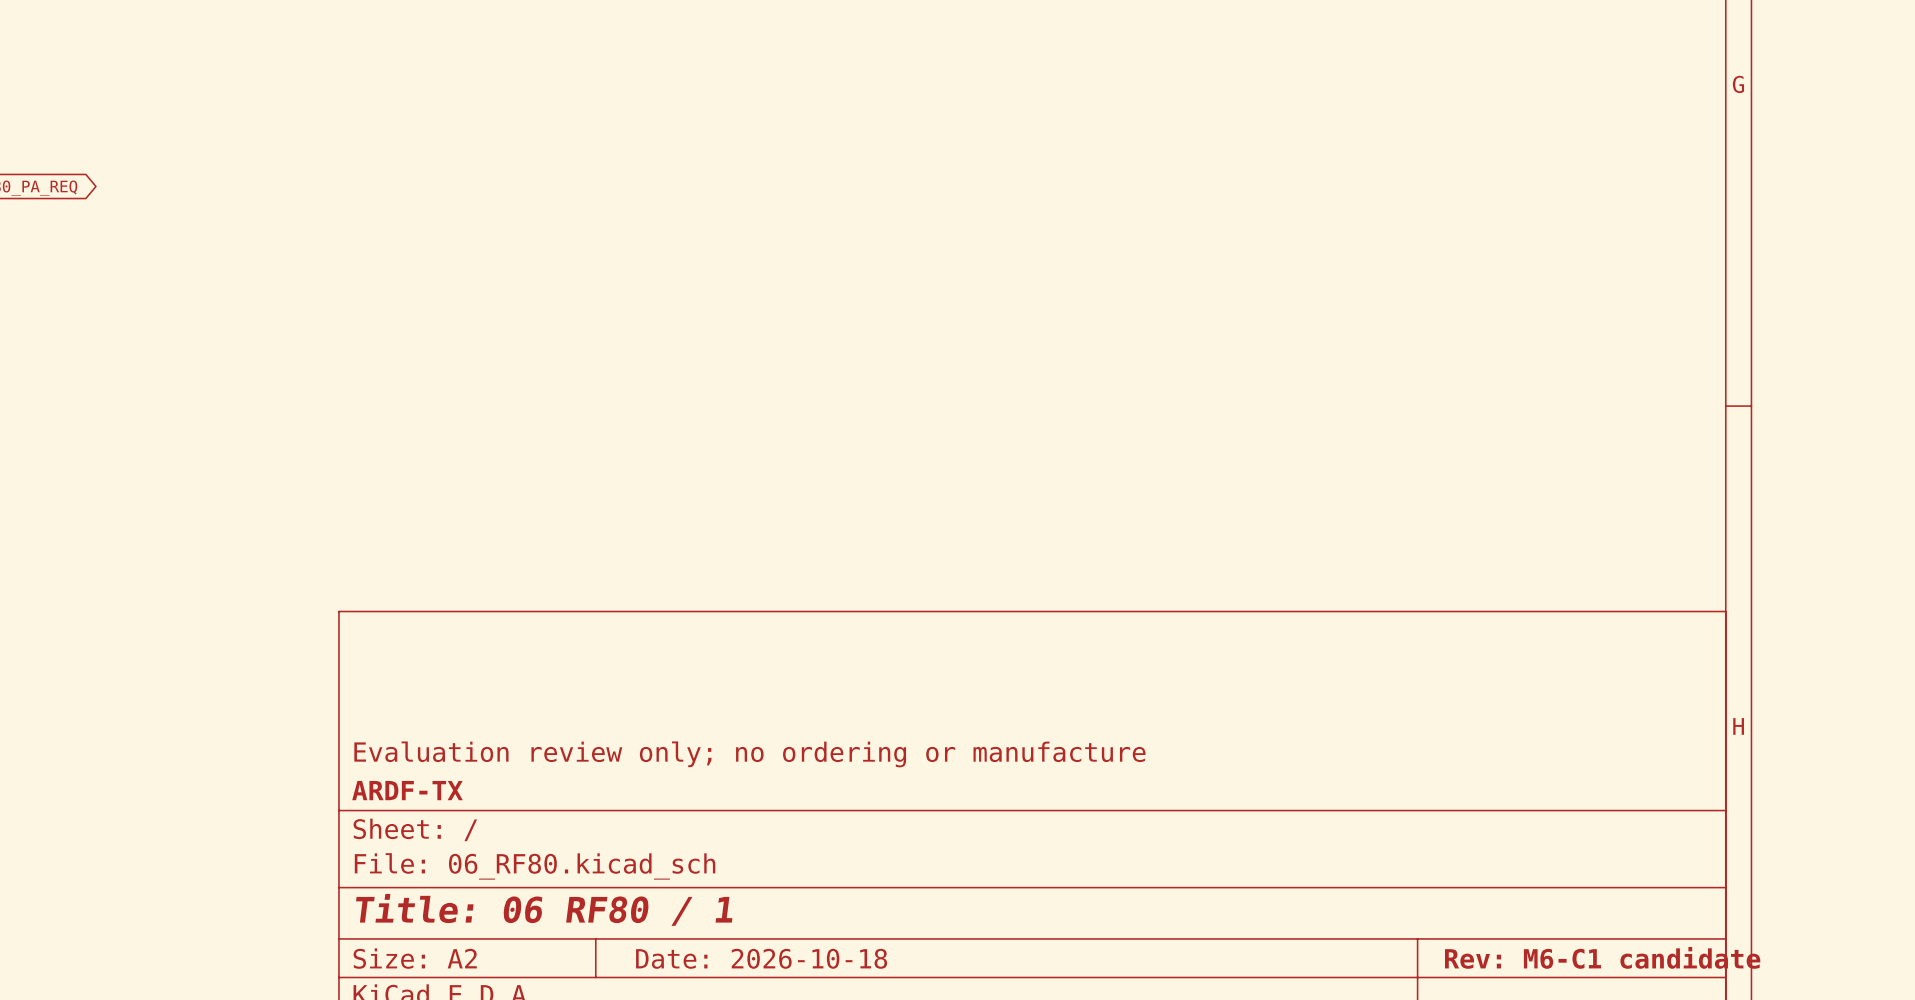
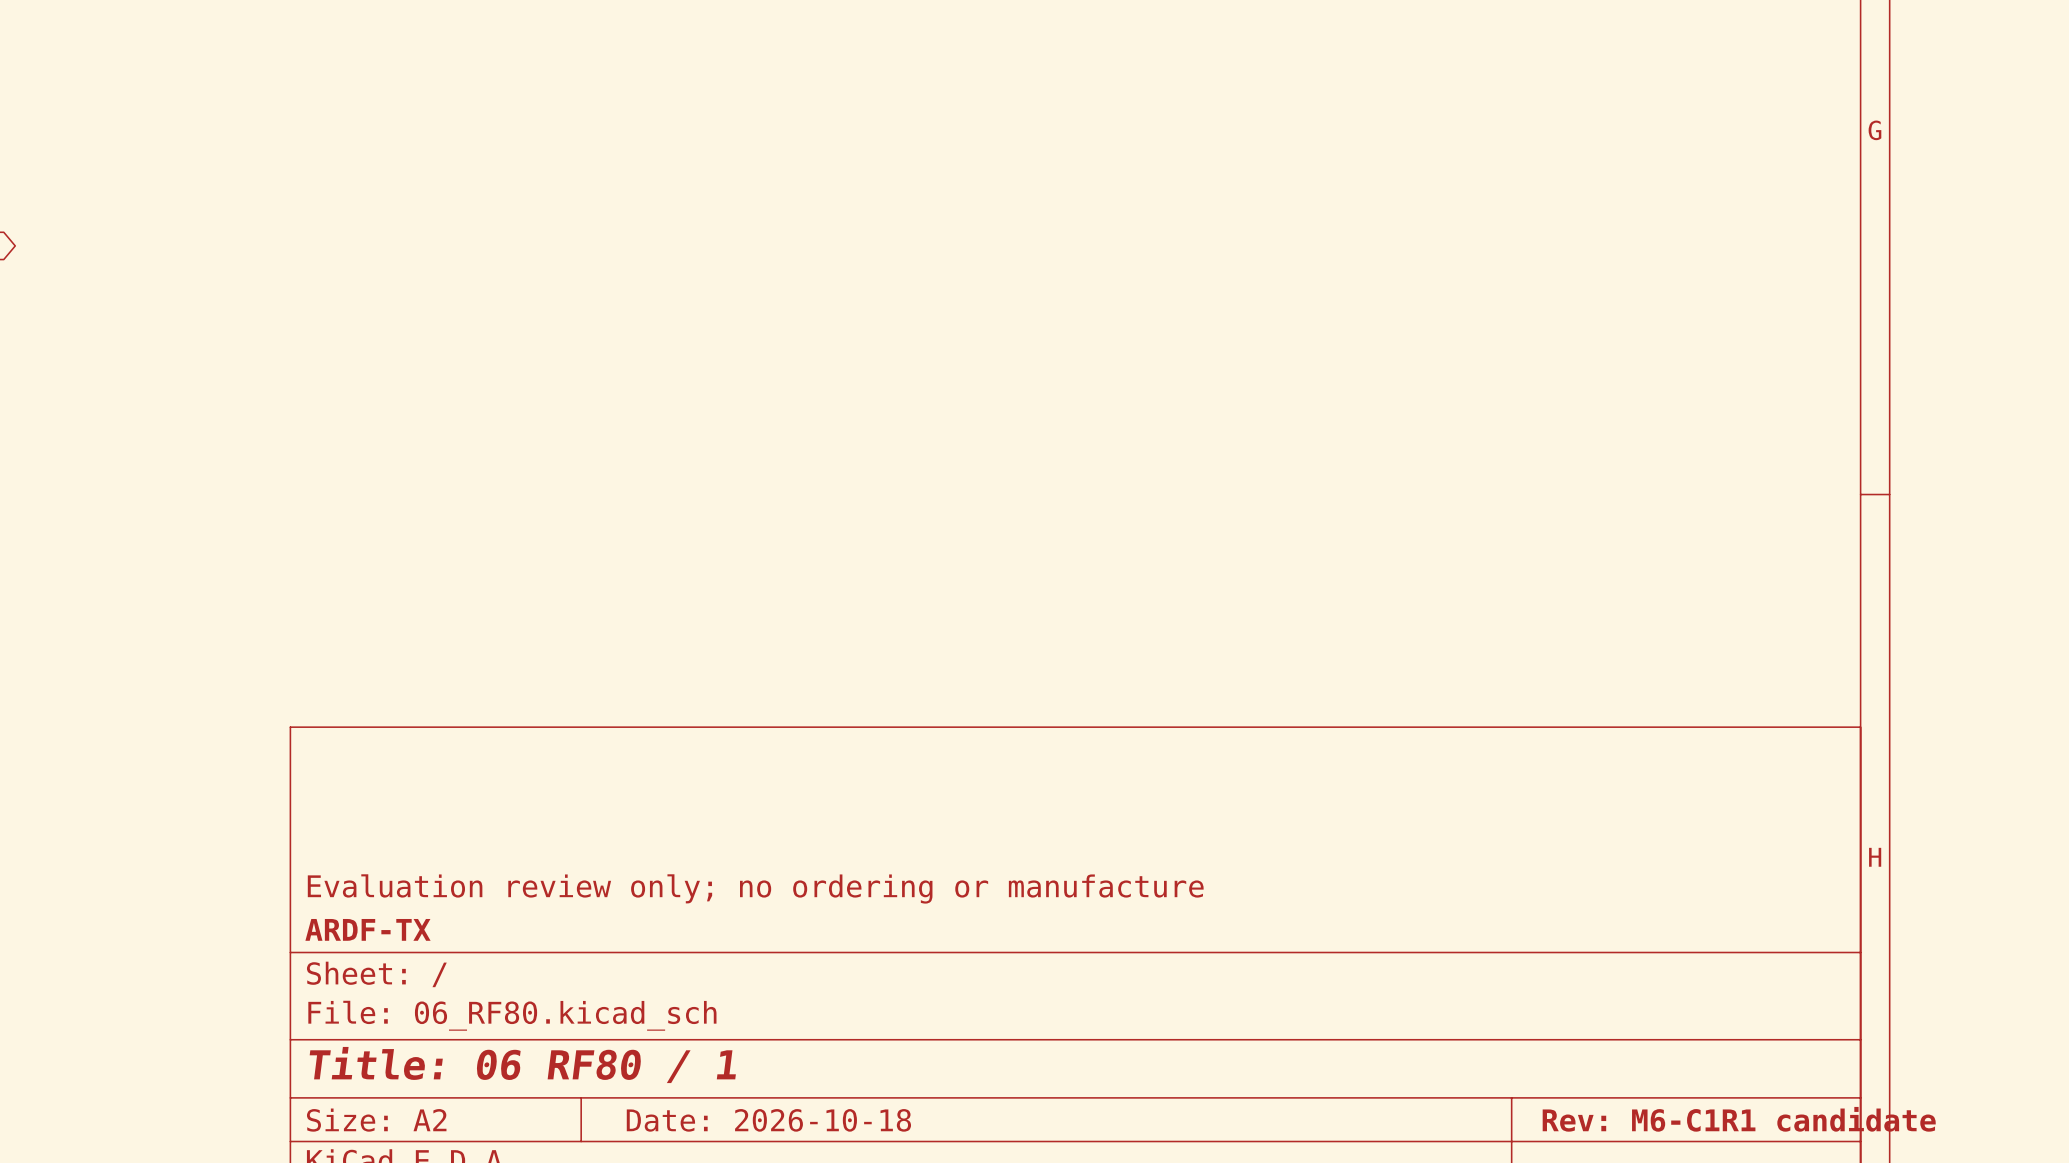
title block: Rev: M6-C1 candidate (1602, 957) -> Rev: M6-C1R1 candidate (1739, 1119)

